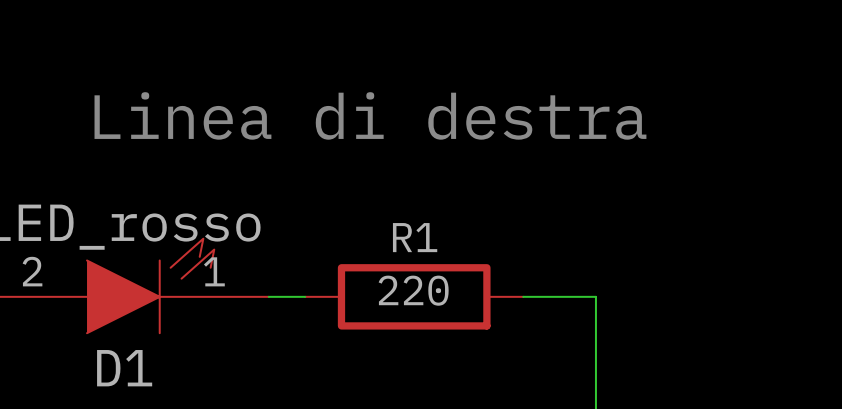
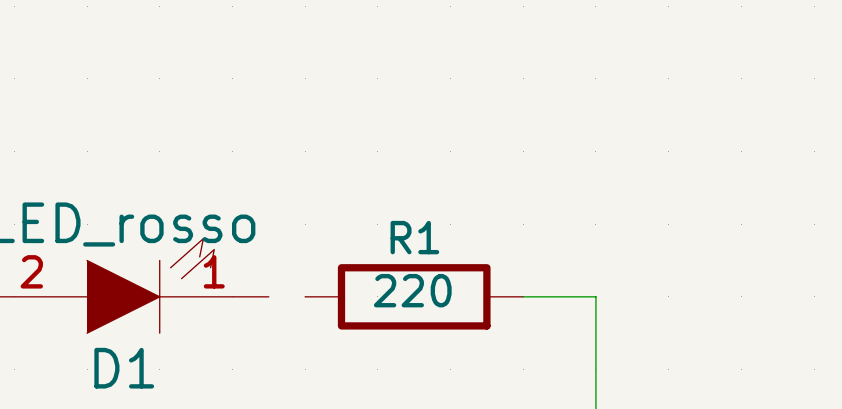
text: Linea di destra (370, 115) -> none
wire: (268, 296) (305, 296) -> none

